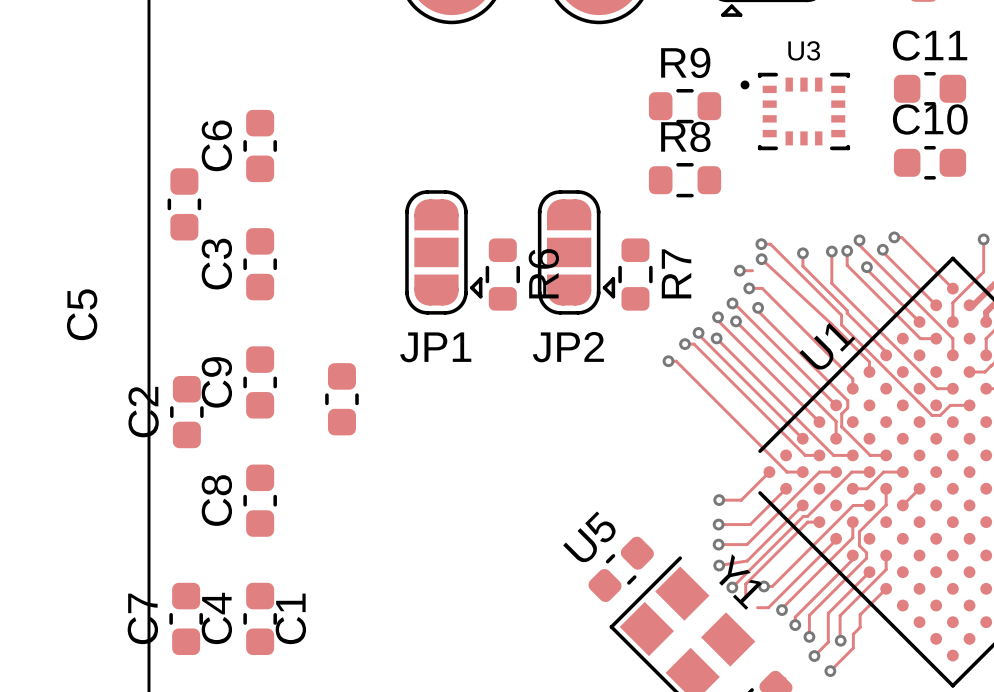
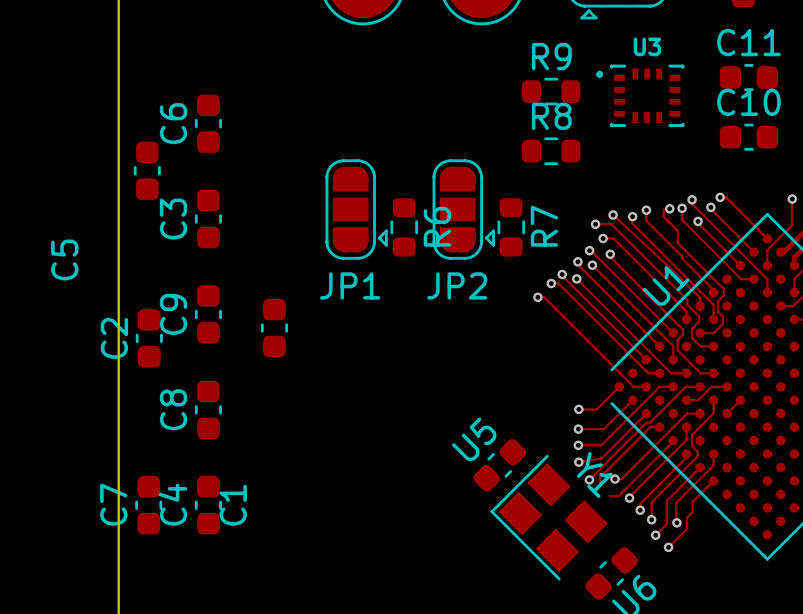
track: (761, 244) (770, 244) (841, 315) (841, 324) (932, 415) (940, 415) (950, 405) (969, 405) -> none
via position: (761, 244) -> (632, 216)
track: (831, 251) (831, 283) (937, 388) (952, 388) -> none
track: none -> (663, 209) (663, 216) (677, 230) (677, 243) (723, 289) (723, 295) (718, 301) (718, 311) (723, 316) (723, 323) (714, 332) (700, 332)
track: none -> (632, 216) (632, 223) (713, 304) (713, 319)
track: none -> (605, 224) (611, 224) (687, 299) (687, 304) (699, 316) (699, 321) (692, 328) (692, 337) (700, 346) (713, 346)

